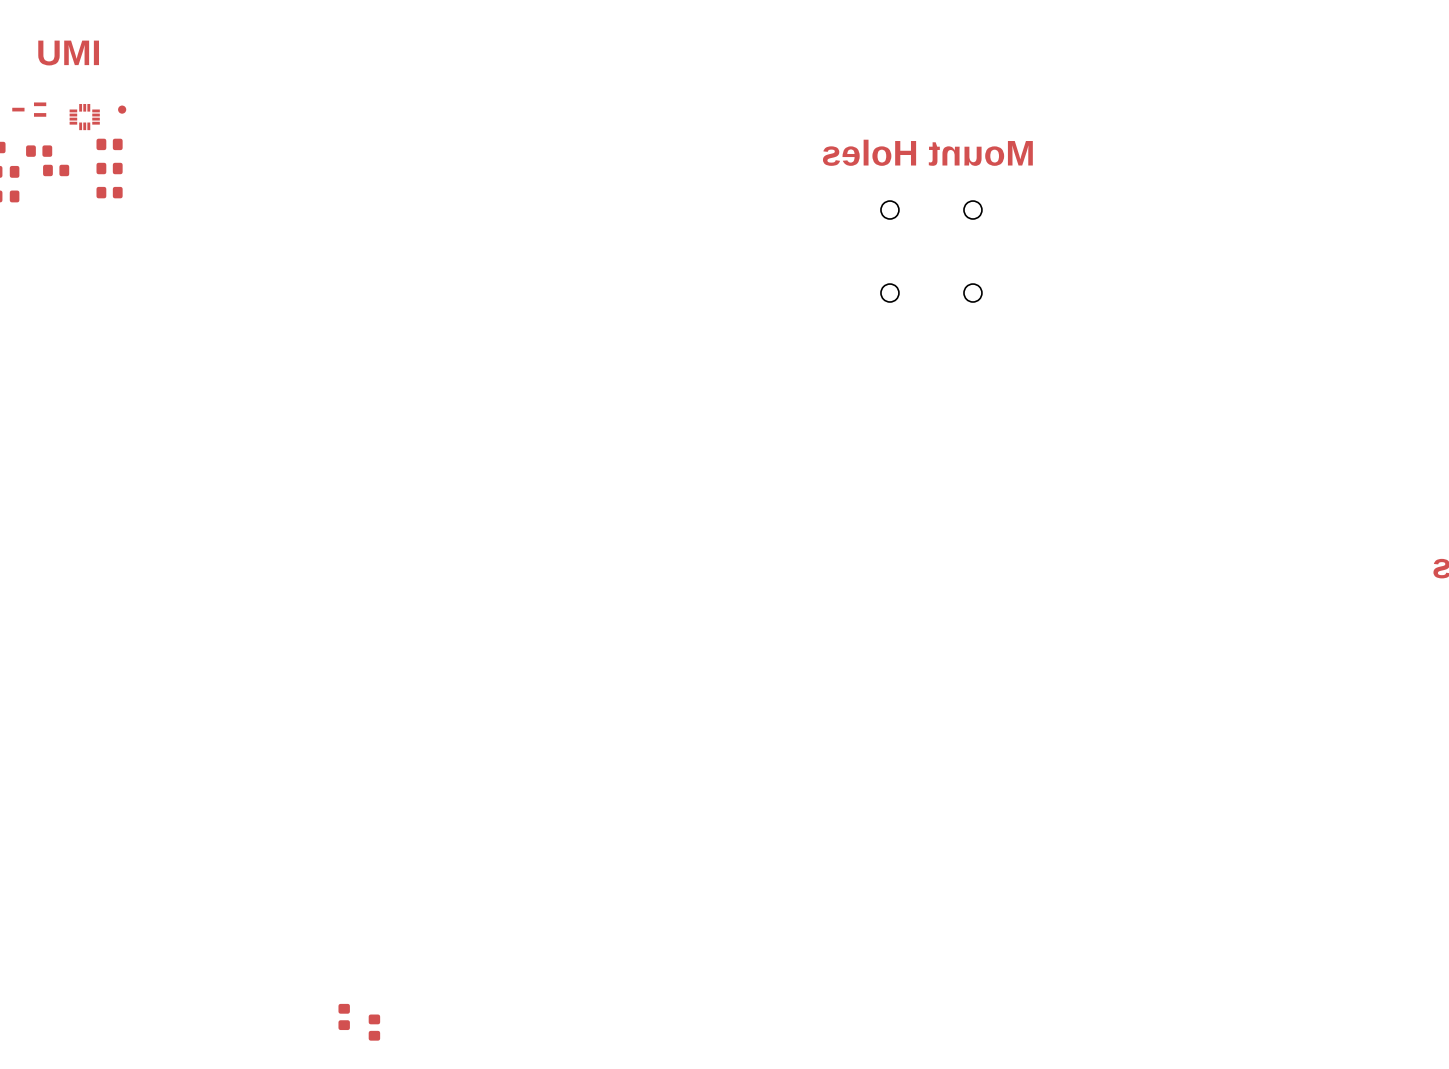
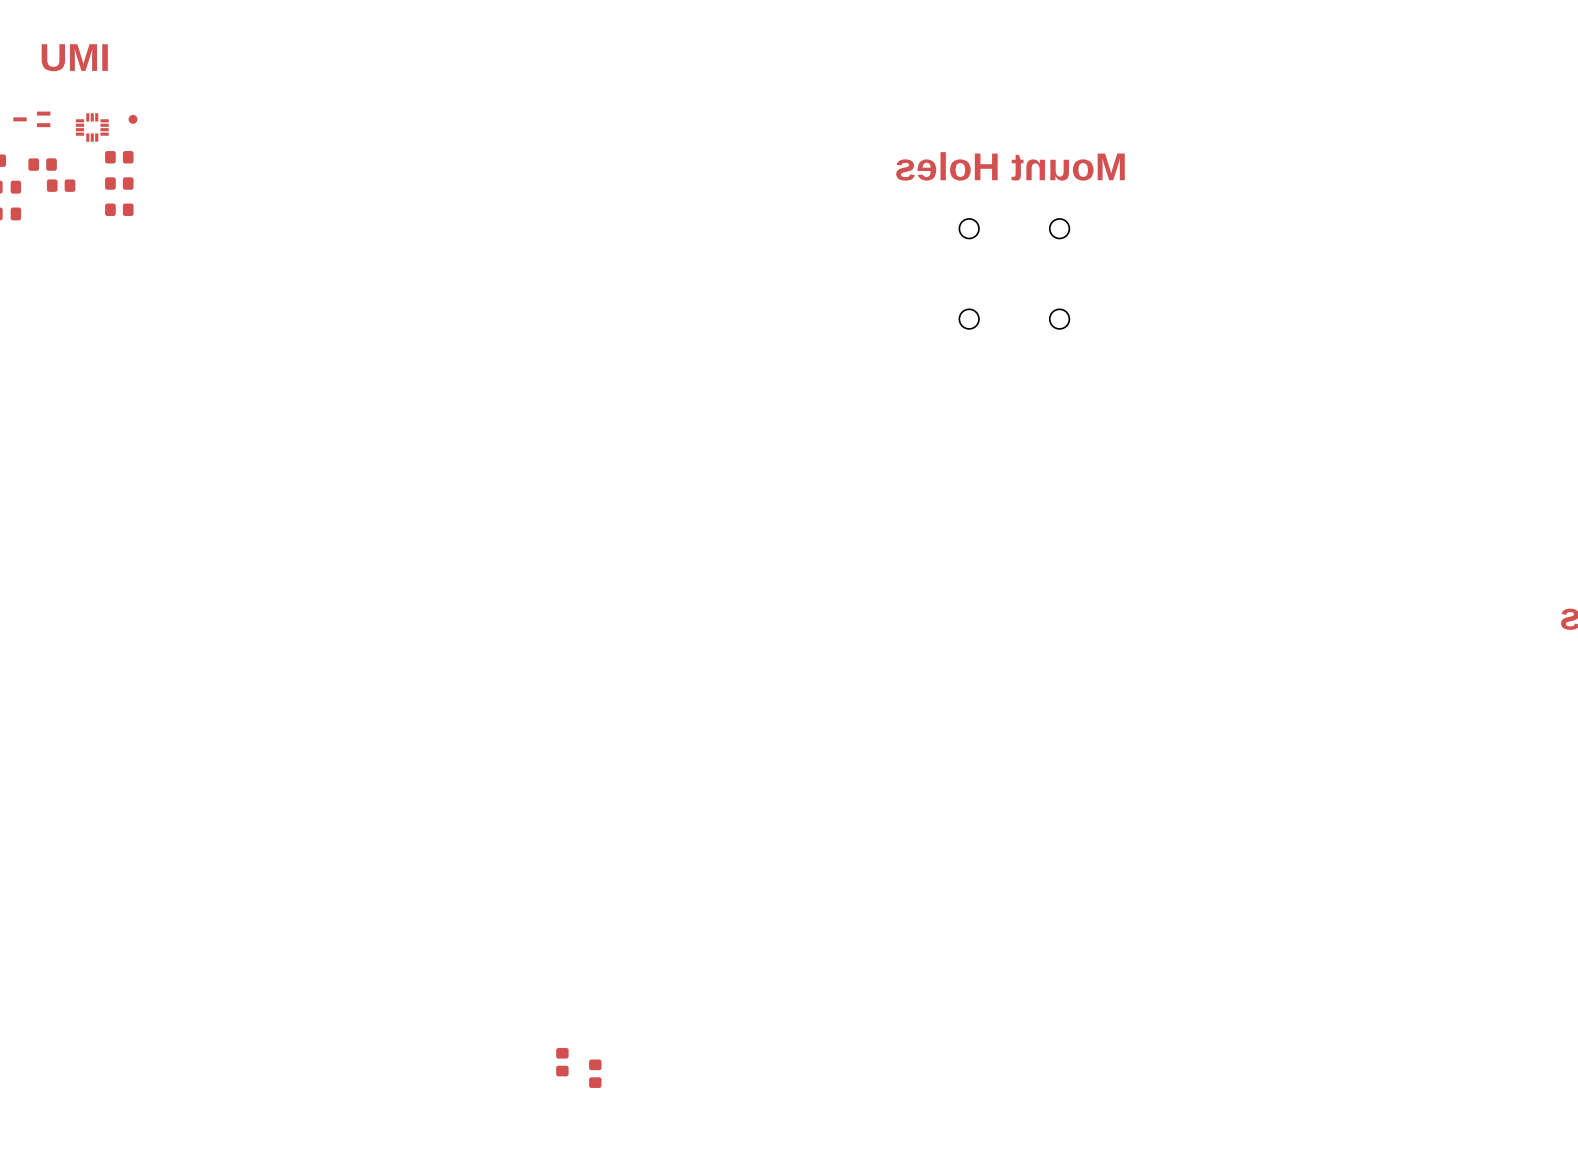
part: none -> (562, 1062)
part: none -> (595, 1073)
part: (344, 1016) -> none
part: (374, 1027) -> none

